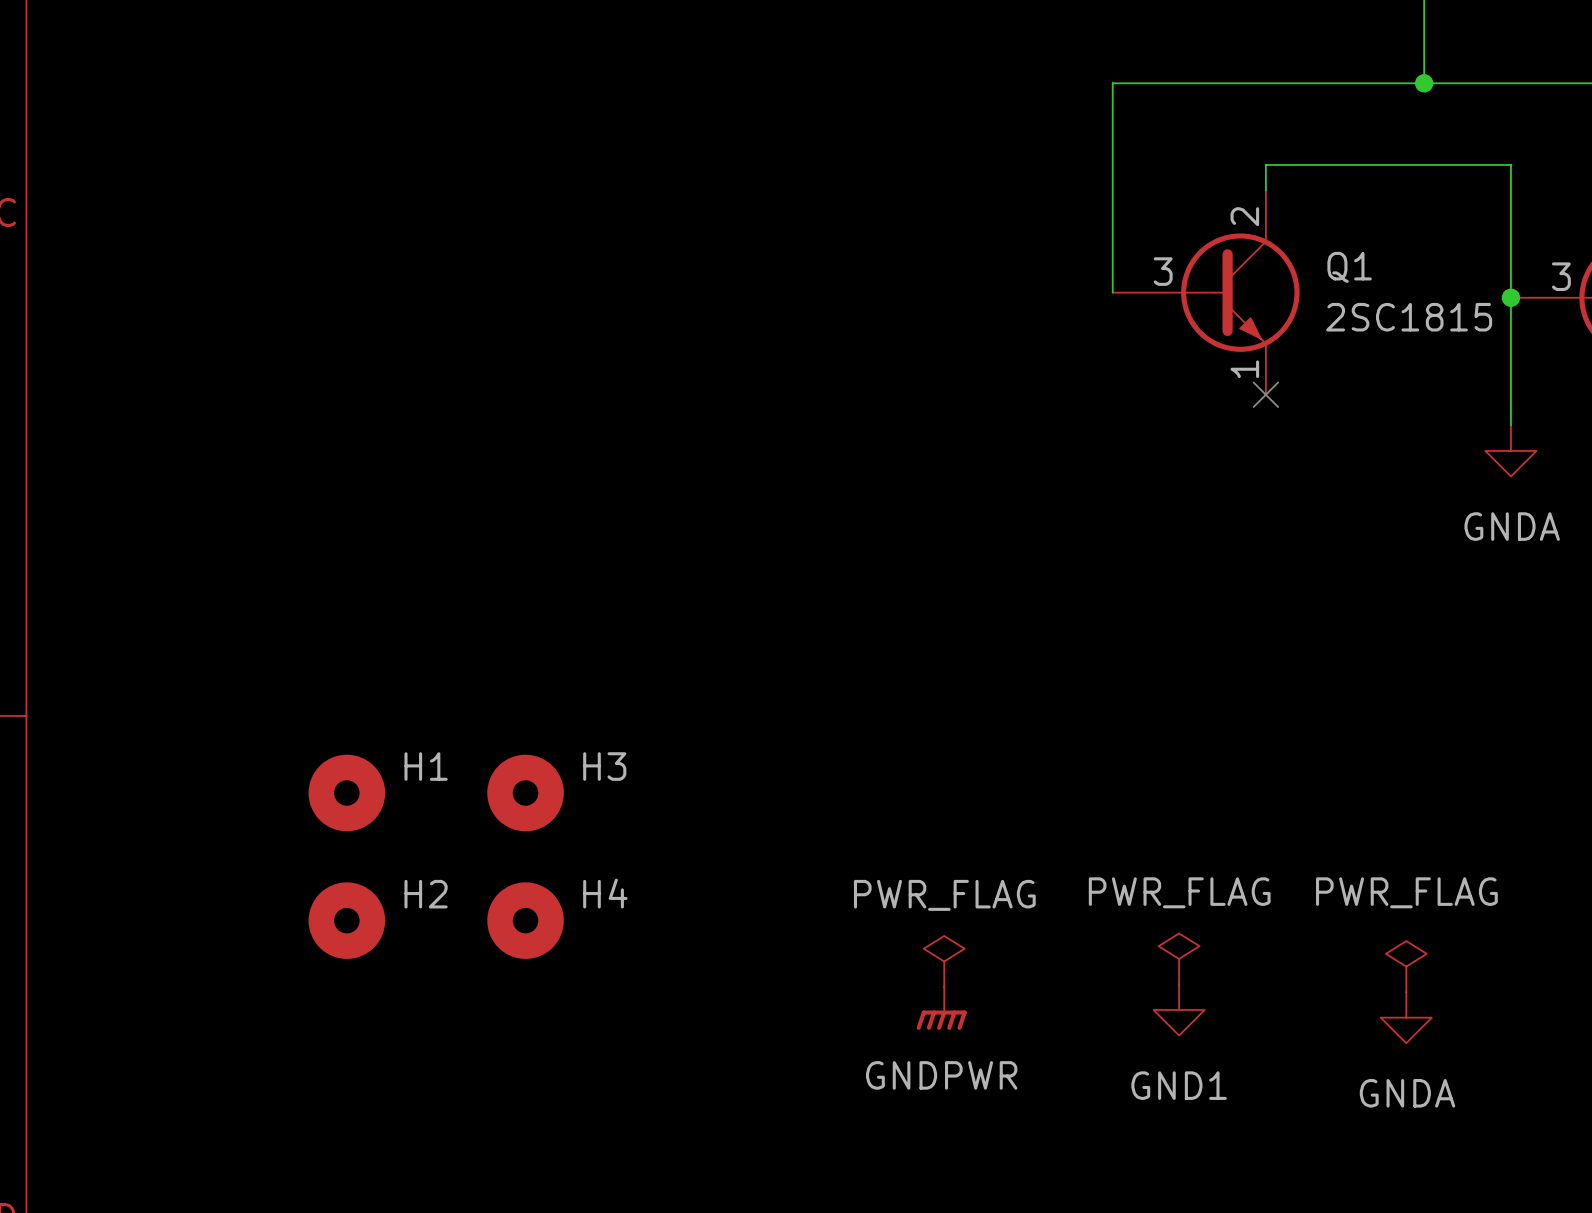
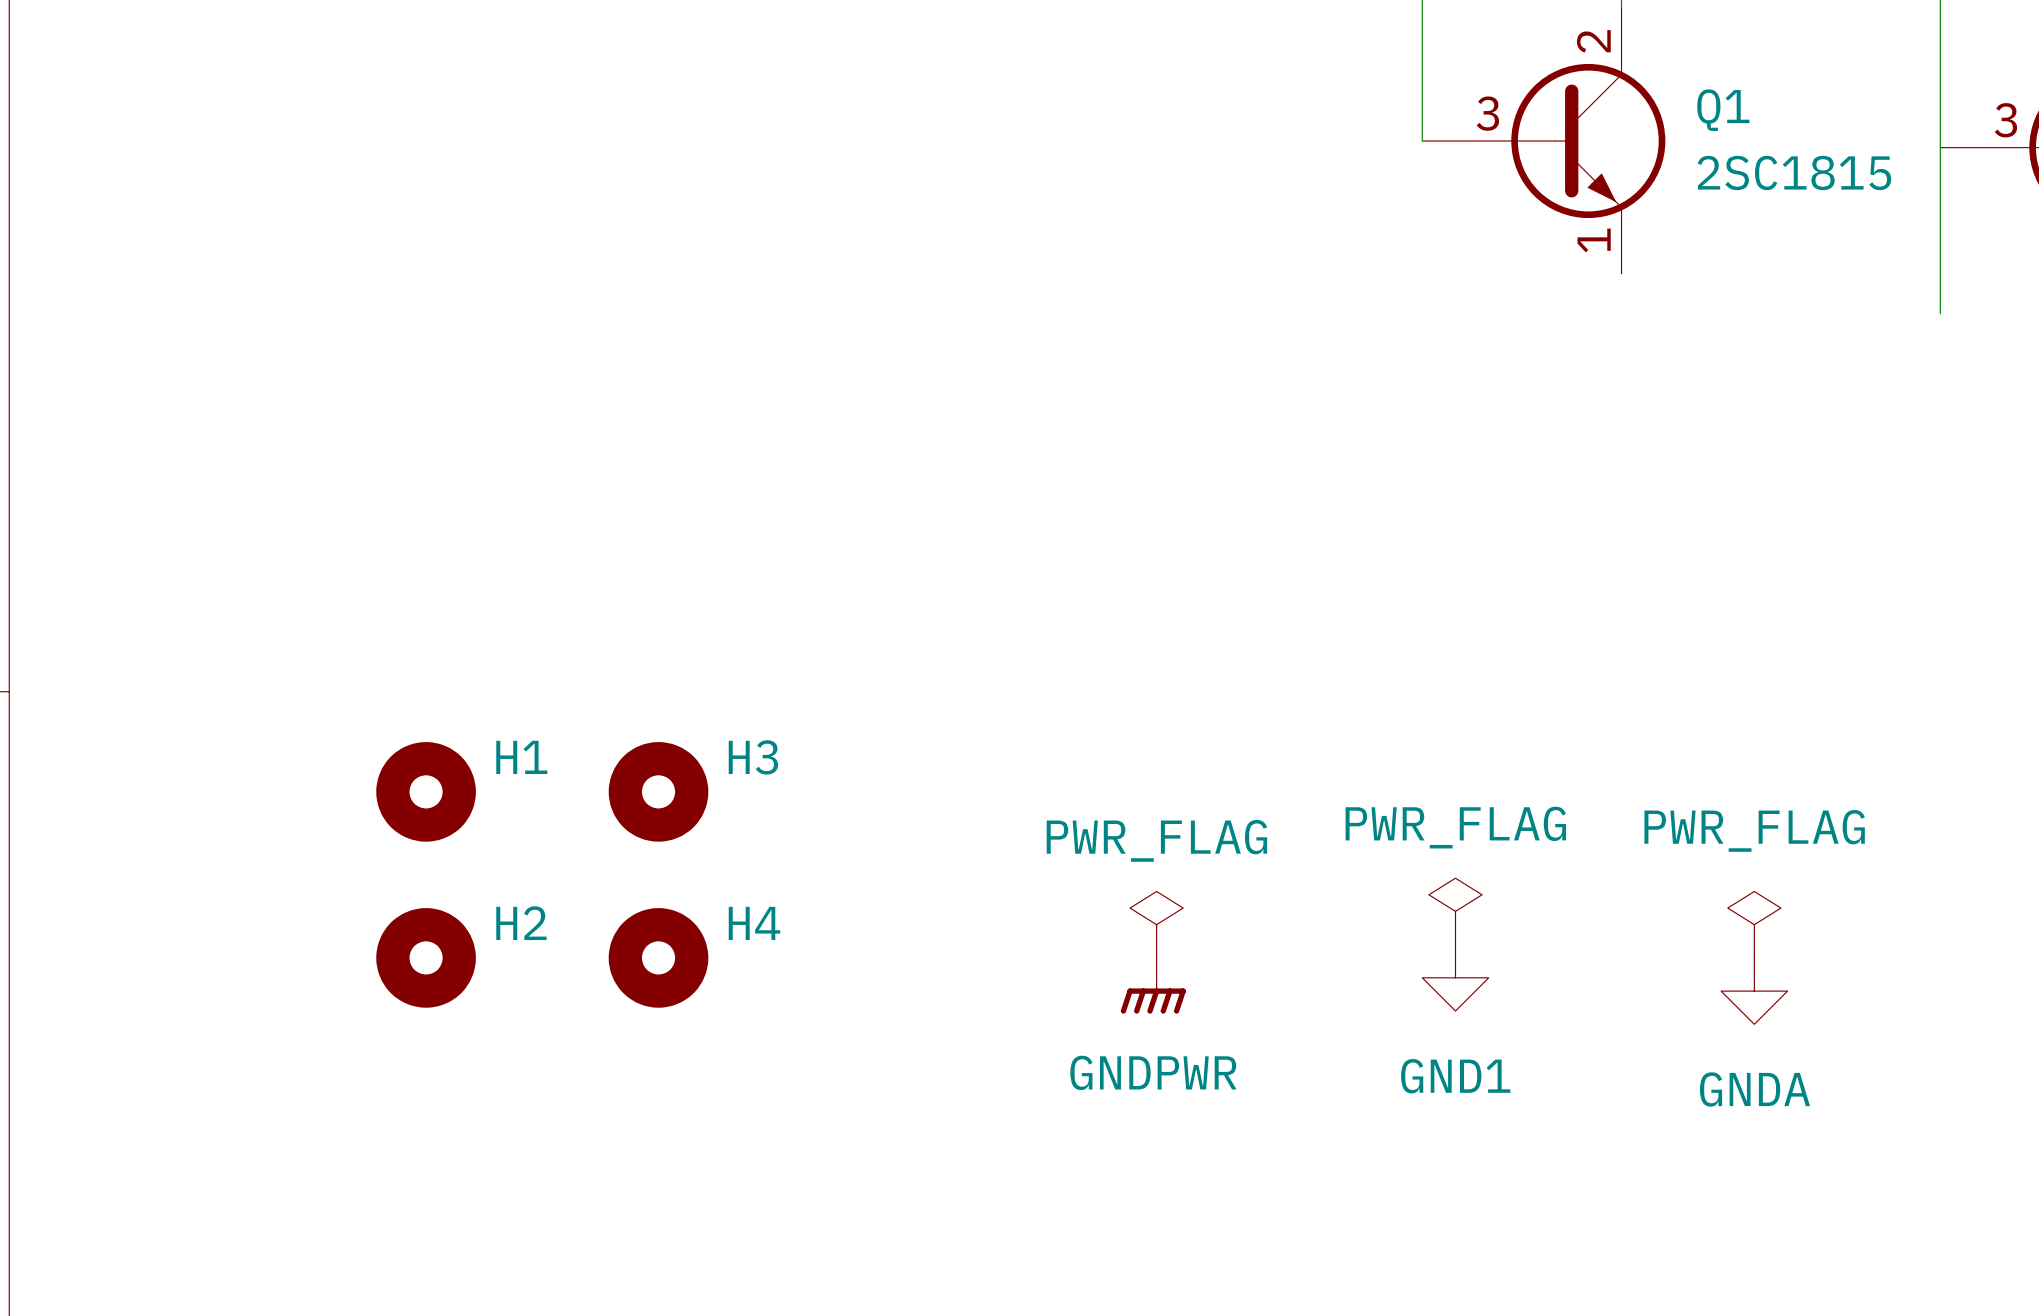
junction: (1510, 297) -> none
no-connect mark: (1265, 394) -> none
power symbol: GNDA (1510, 450) -> none
power symbol position: PWR_FLAG (1179, 958) -> PWR_FLAG (1455, 911)
power symbol position: PWR_FLAG (944, 961) -> PWR_FLAG (1156, 924)
power symbol position: PWR_FLAG (1406, 966) -> PWR_FLAG (1754, 924)
power symbol position: GNDPWR (941, 1008) -> GNDPWR (1153, 985)
power symbol position: GND1 (1179, 1009) -> GND1 (1455, 977)
power symbol position: GNDA (1406, 1017) -> GNDA (1754, 991)

